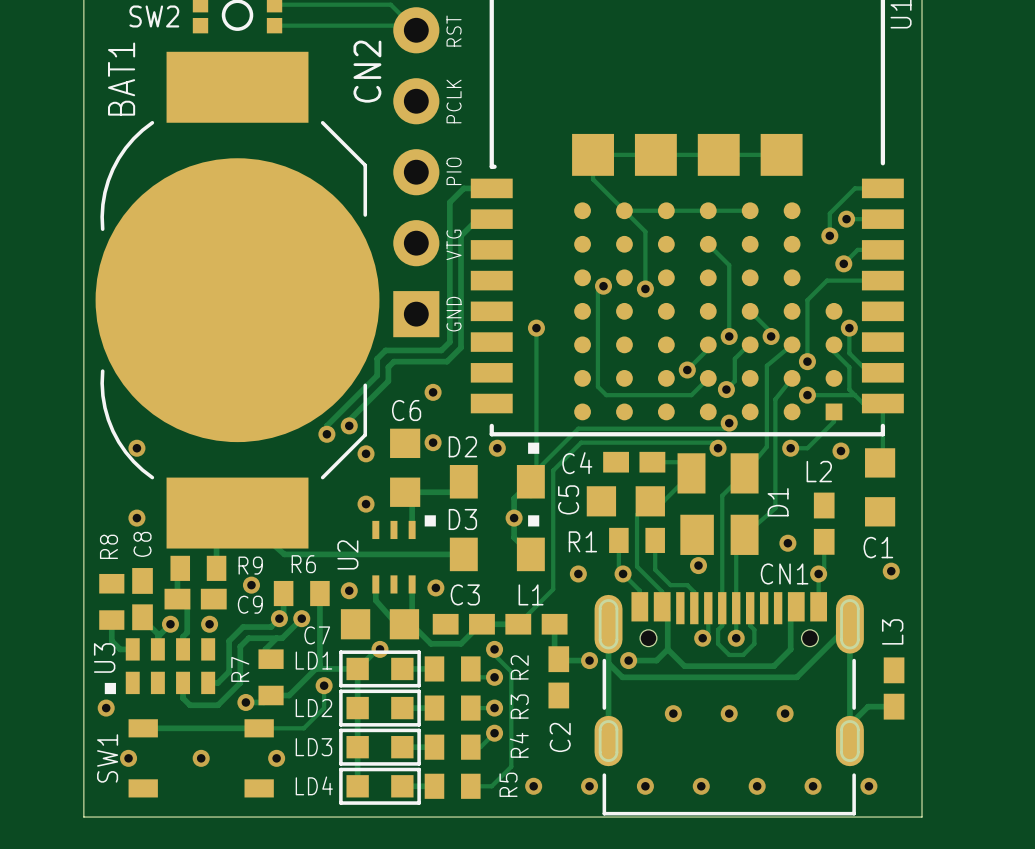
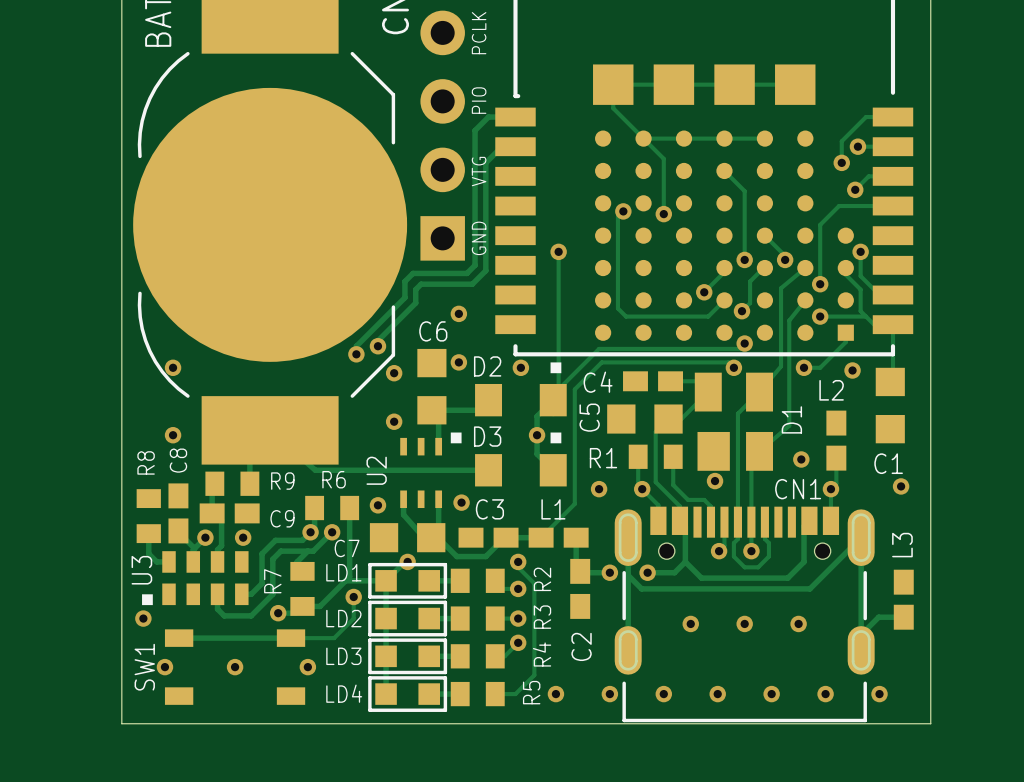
via: (251, 585) -> none

